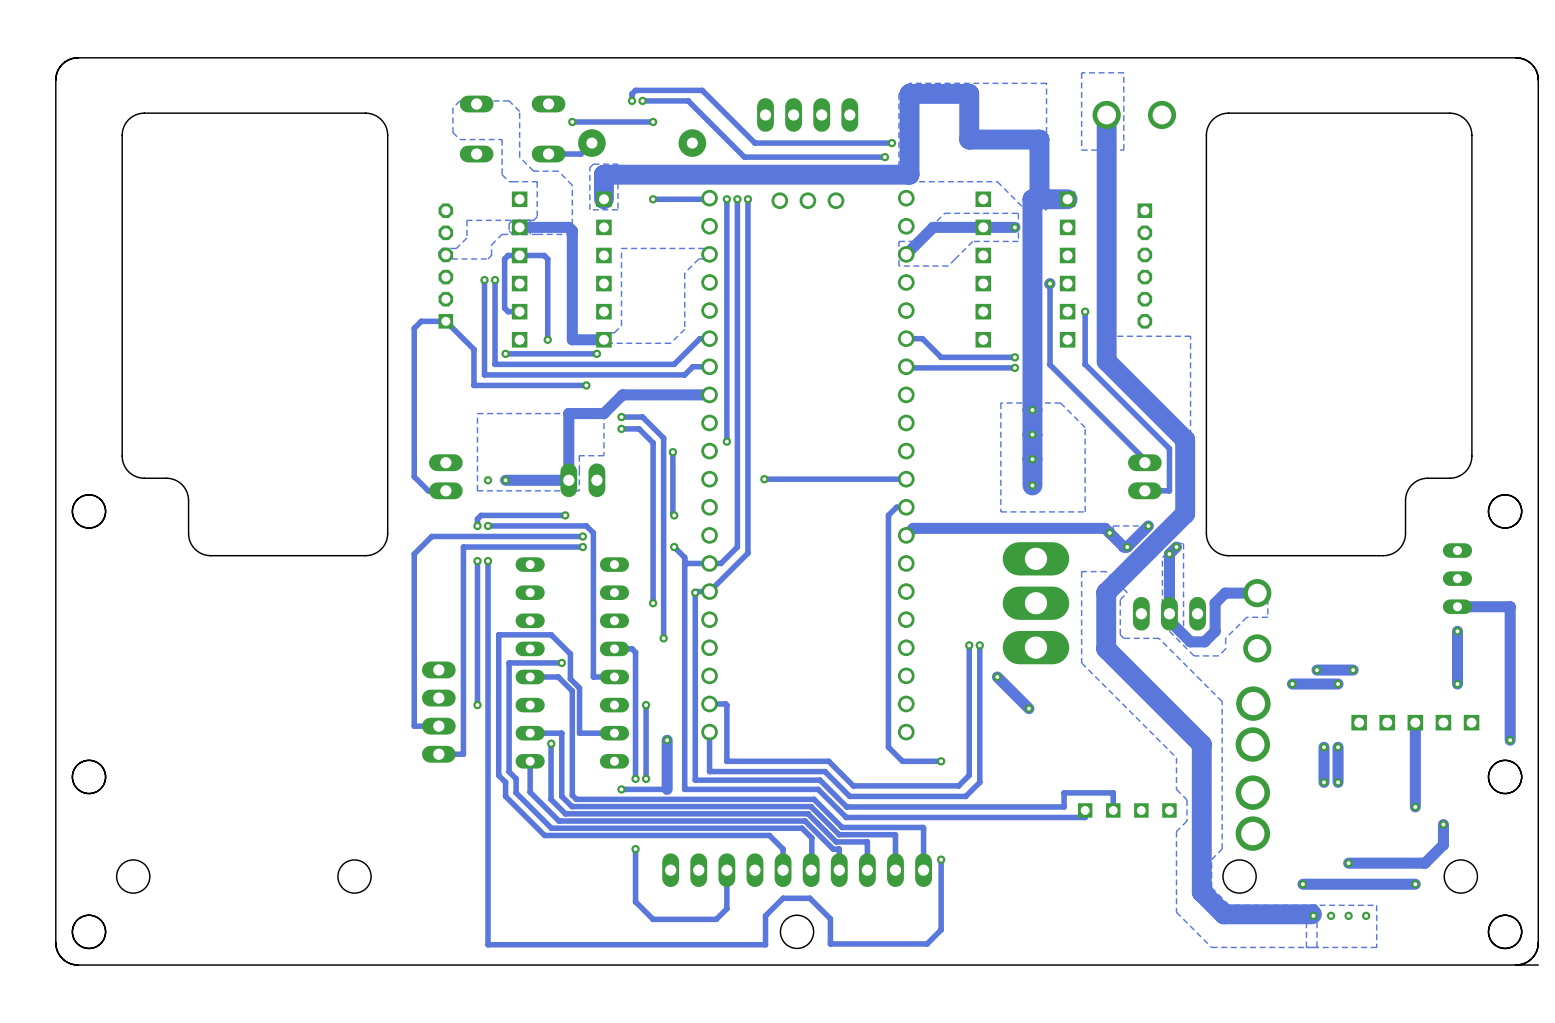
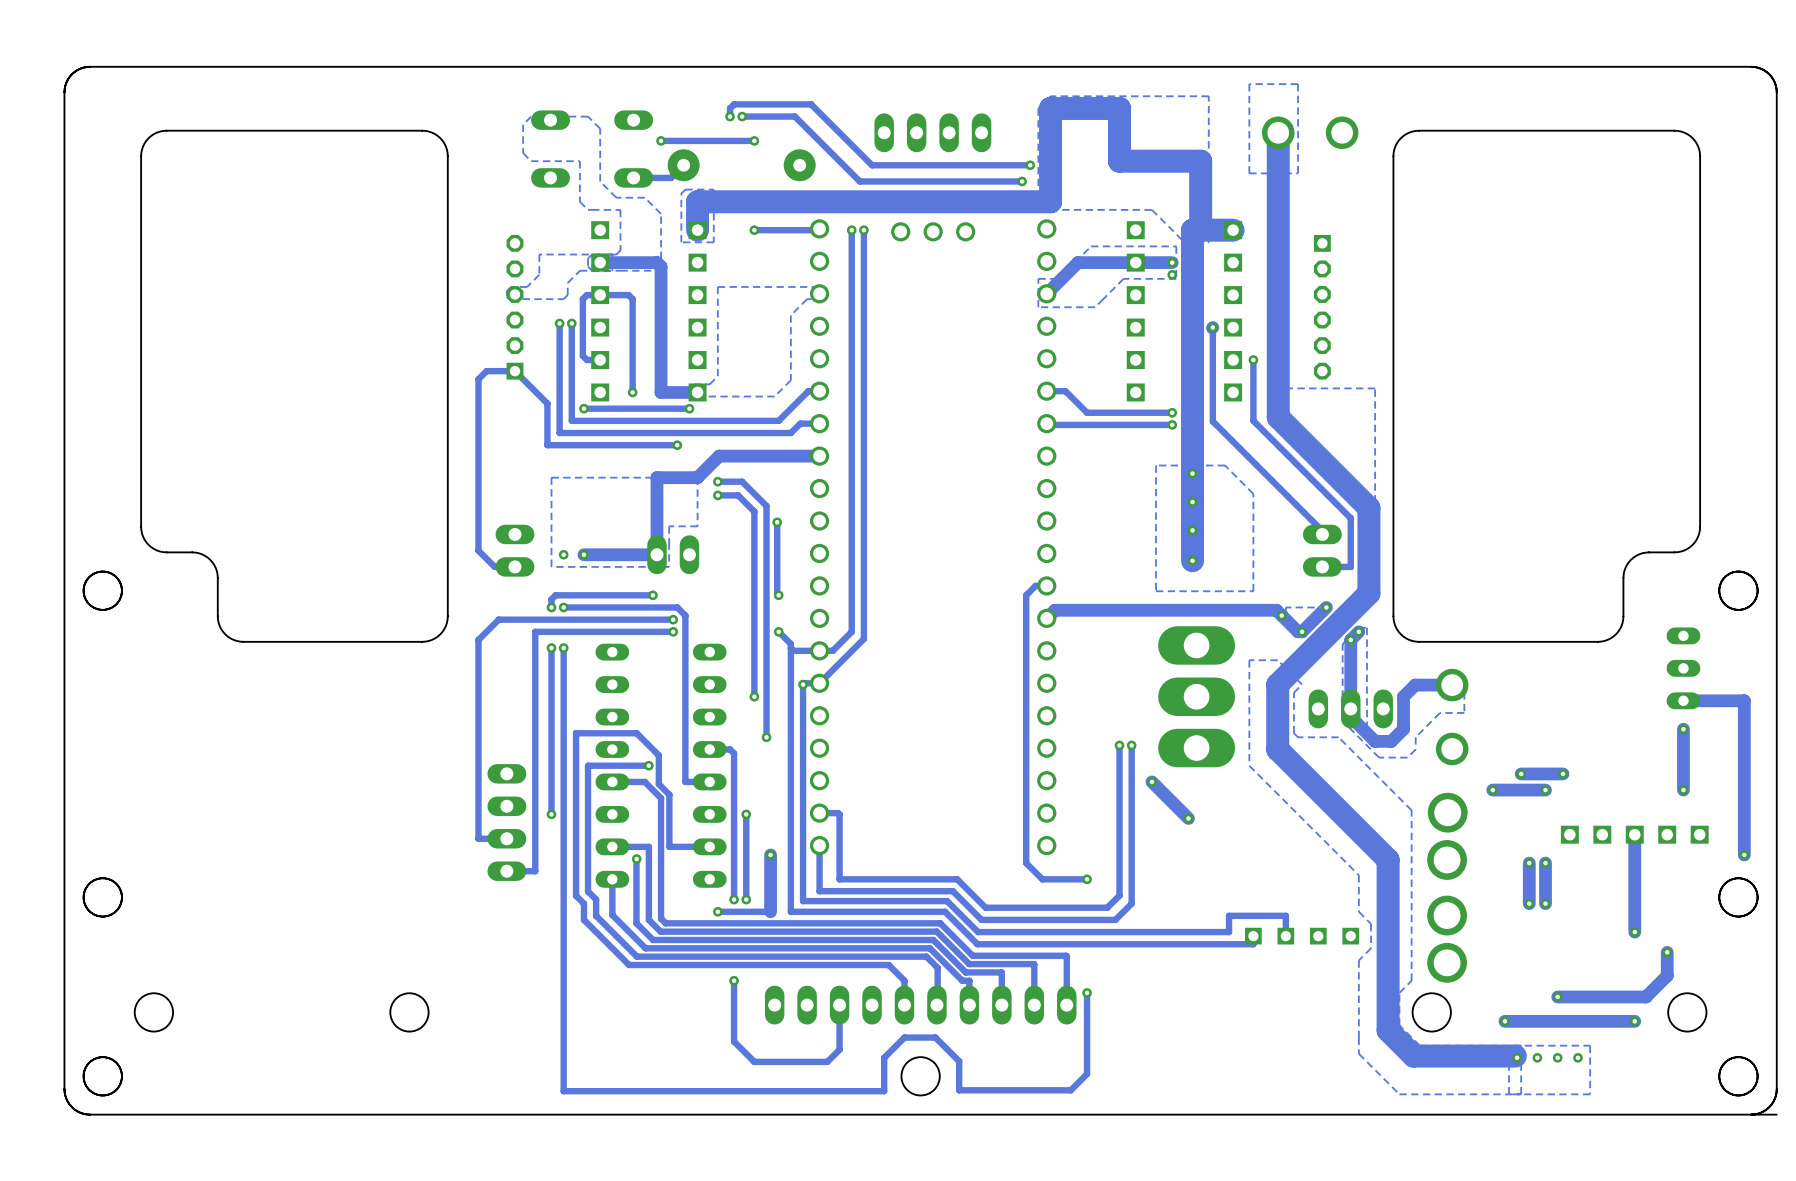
track: (726, 199) (726, 441) -> none
via: (726, 199) -> none
via: none -> (1172, 274)
via: (726, 441) -> none
via: (764, 479) -> none
track: (906, 479) (764, 479) -> none

